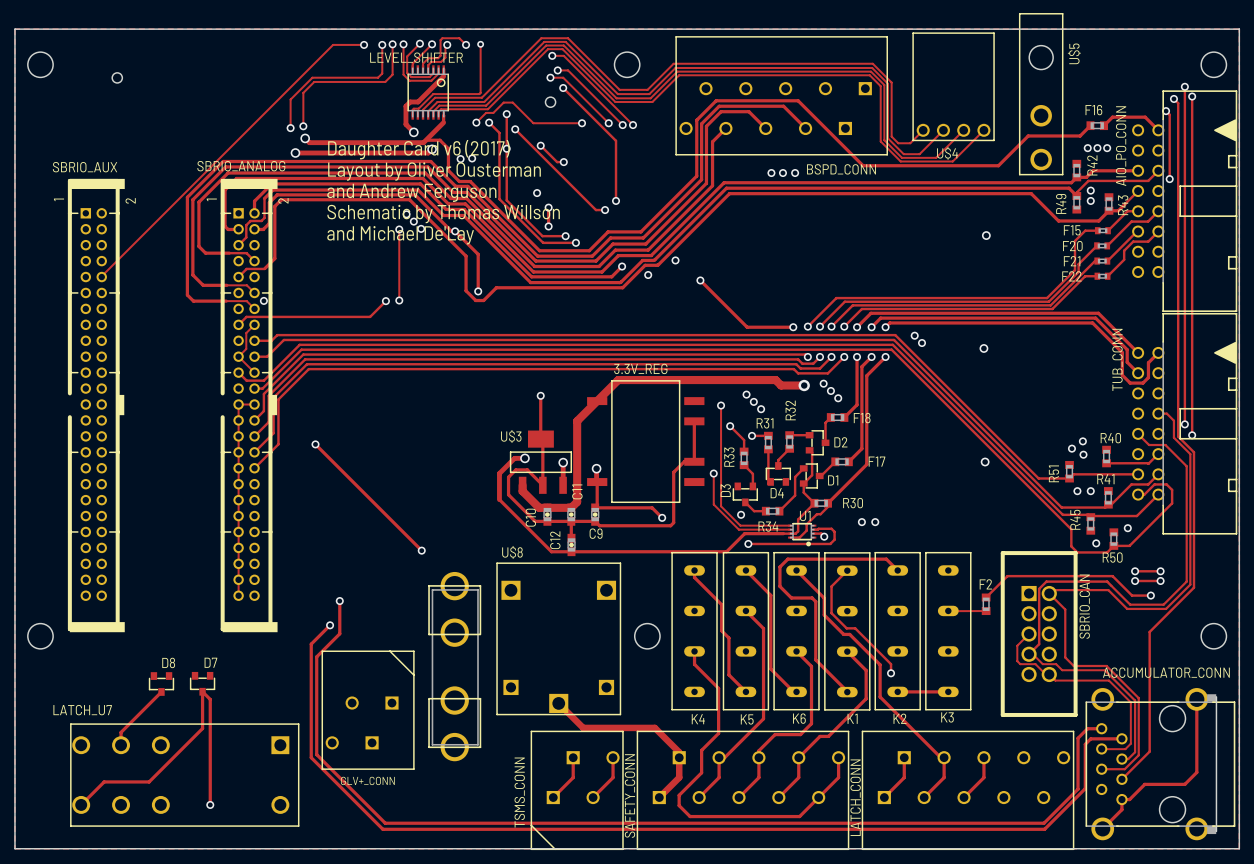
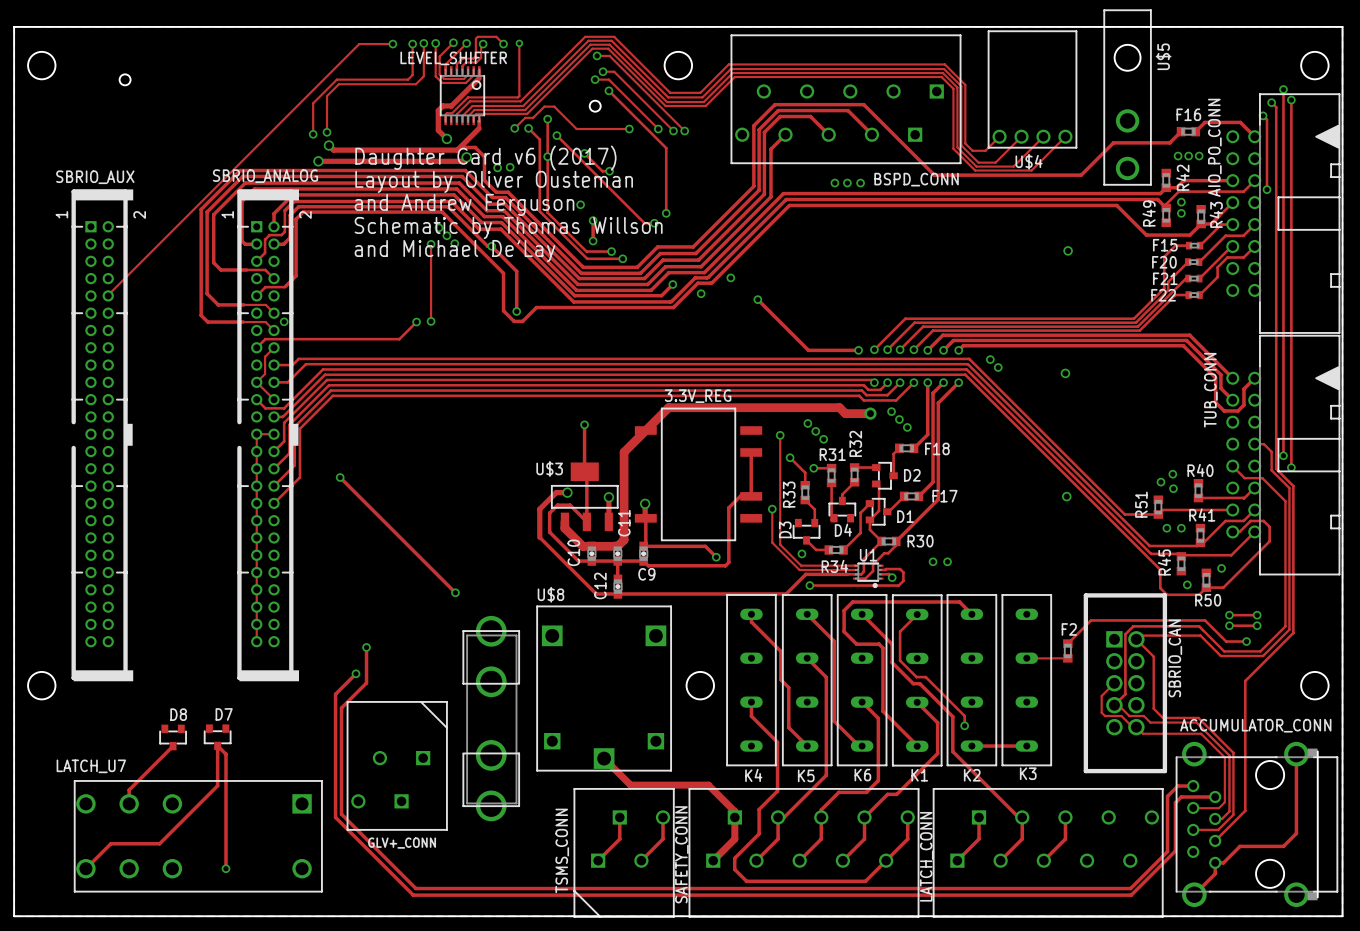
text: Layout by Oliver Ousterman (434, 171) -> Layout by Oliver Ousteman (494, 181)

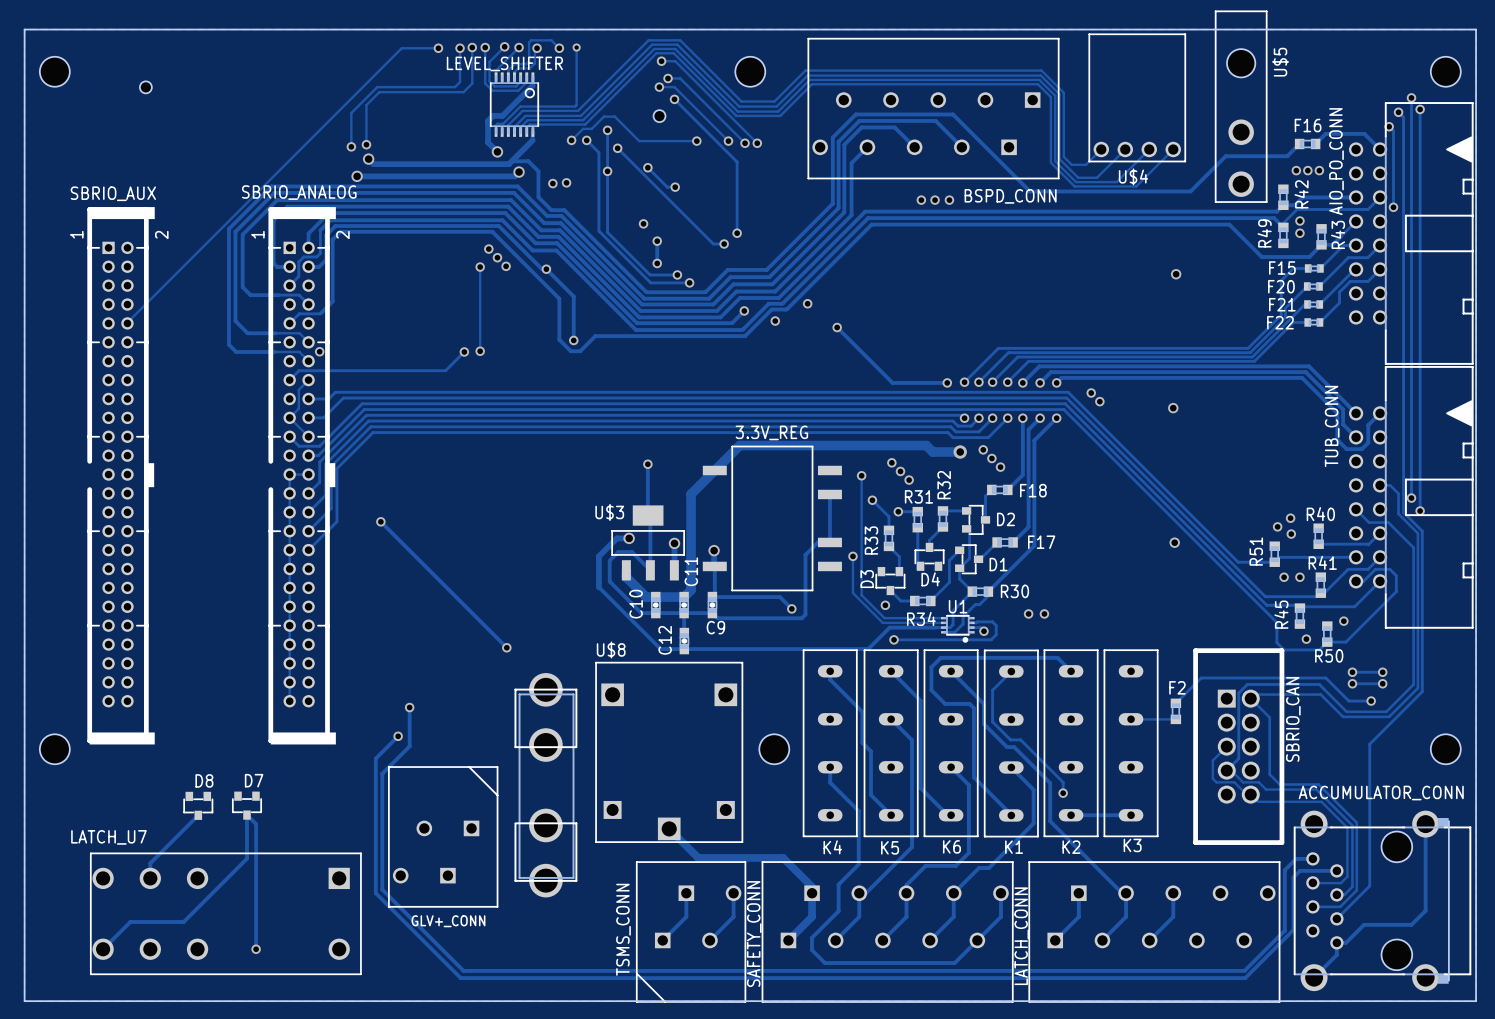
text: Daughter Card v6 (2017) (485, 158) -> none
text: Layout by Oliver Ousteman (494, 181) -> none
text: and Andrew Ferguson (464, 204) -> none
text: Schematic by Thomas Willson (508, 227) -> none
text: and Michael De'Lay (454, 251) -> none

